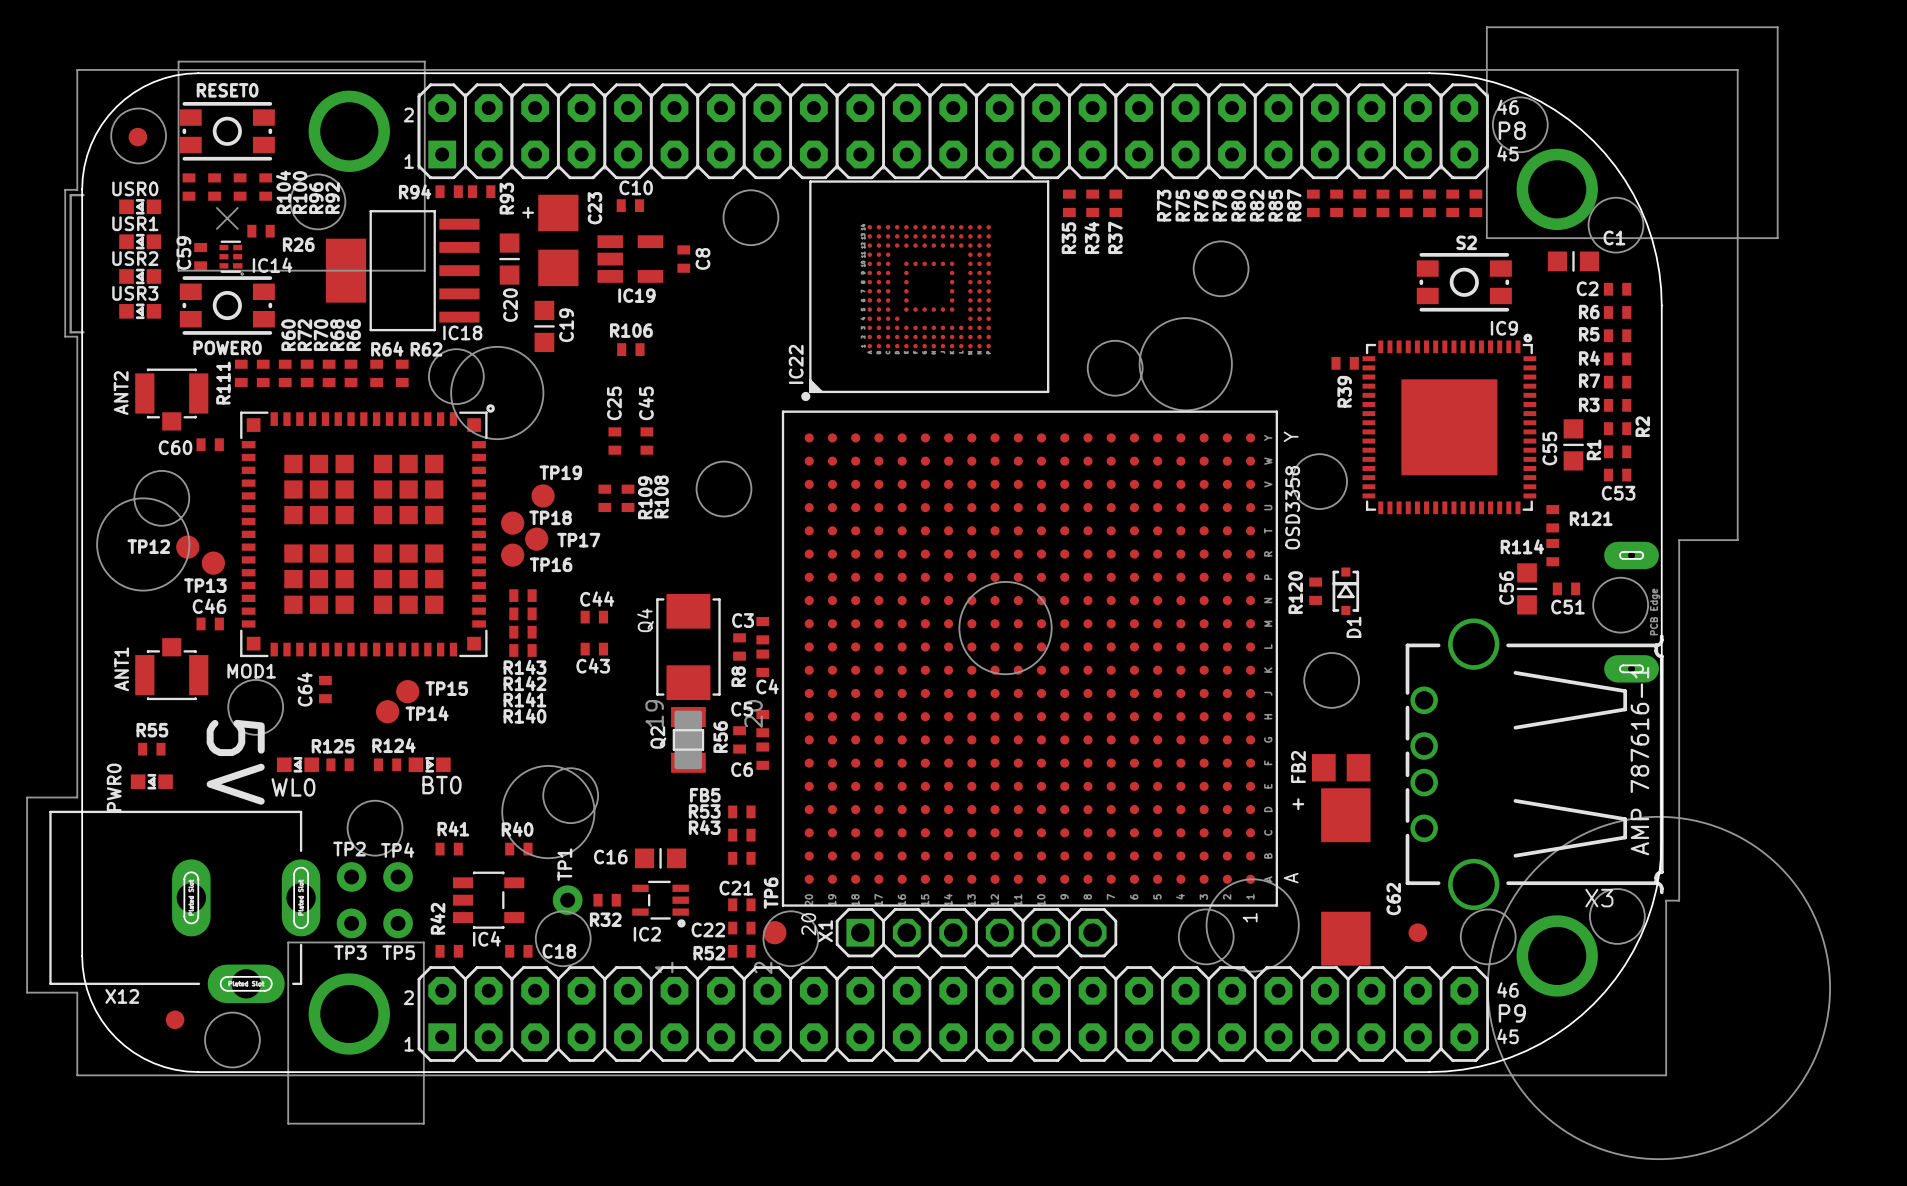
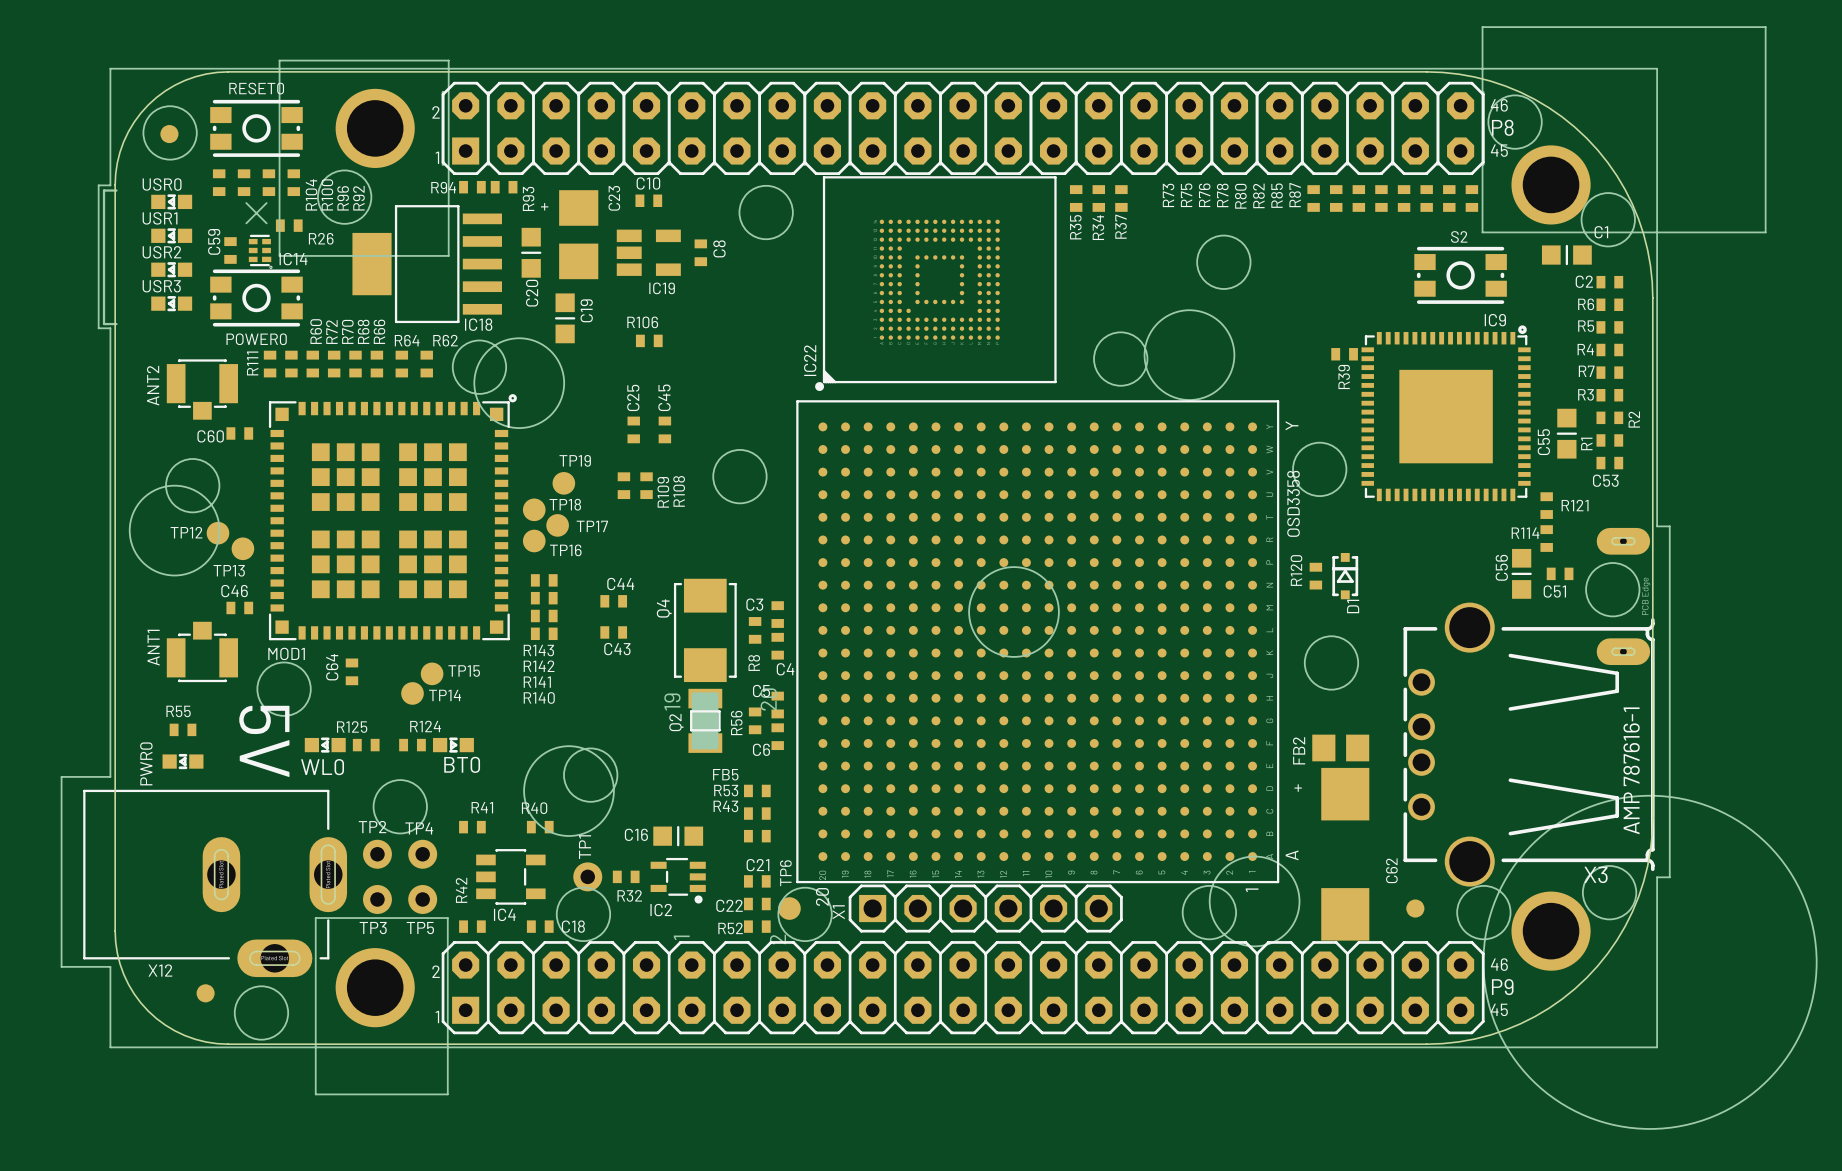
line: (251, 61) (178, 61) (178, 270) (424, 270) (424, 262) -> (279, 60) (279, 255) (448, 255)
line: (1666, 69) (1737, 69) (1737, 540) (1679, 540) -> (1657, 68) (1657, 526) (1669, 526)

